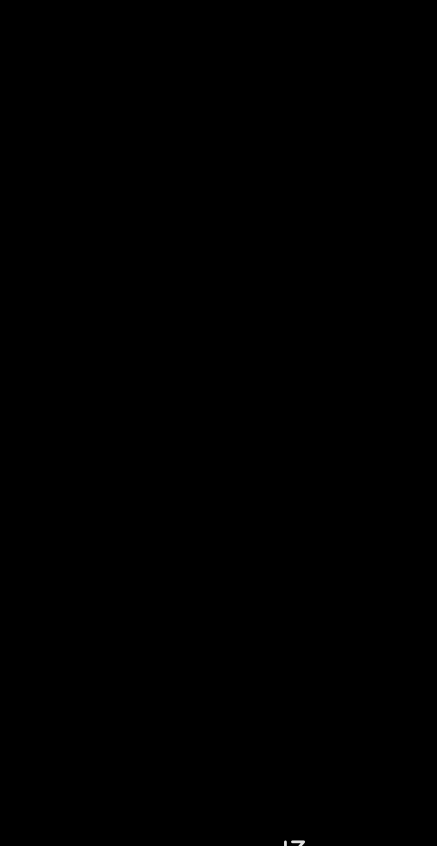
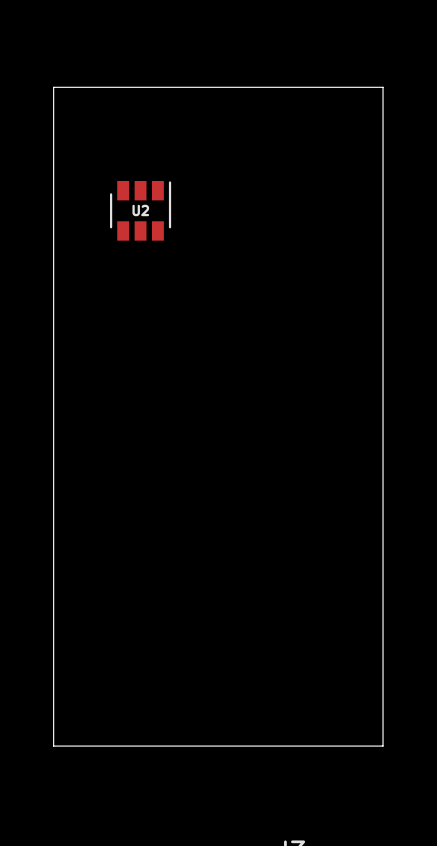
board edge: none -> (53, 87) (383, 87) (383, 746) (53, 746) (53, 87)
U2: none -> (140, 210)

